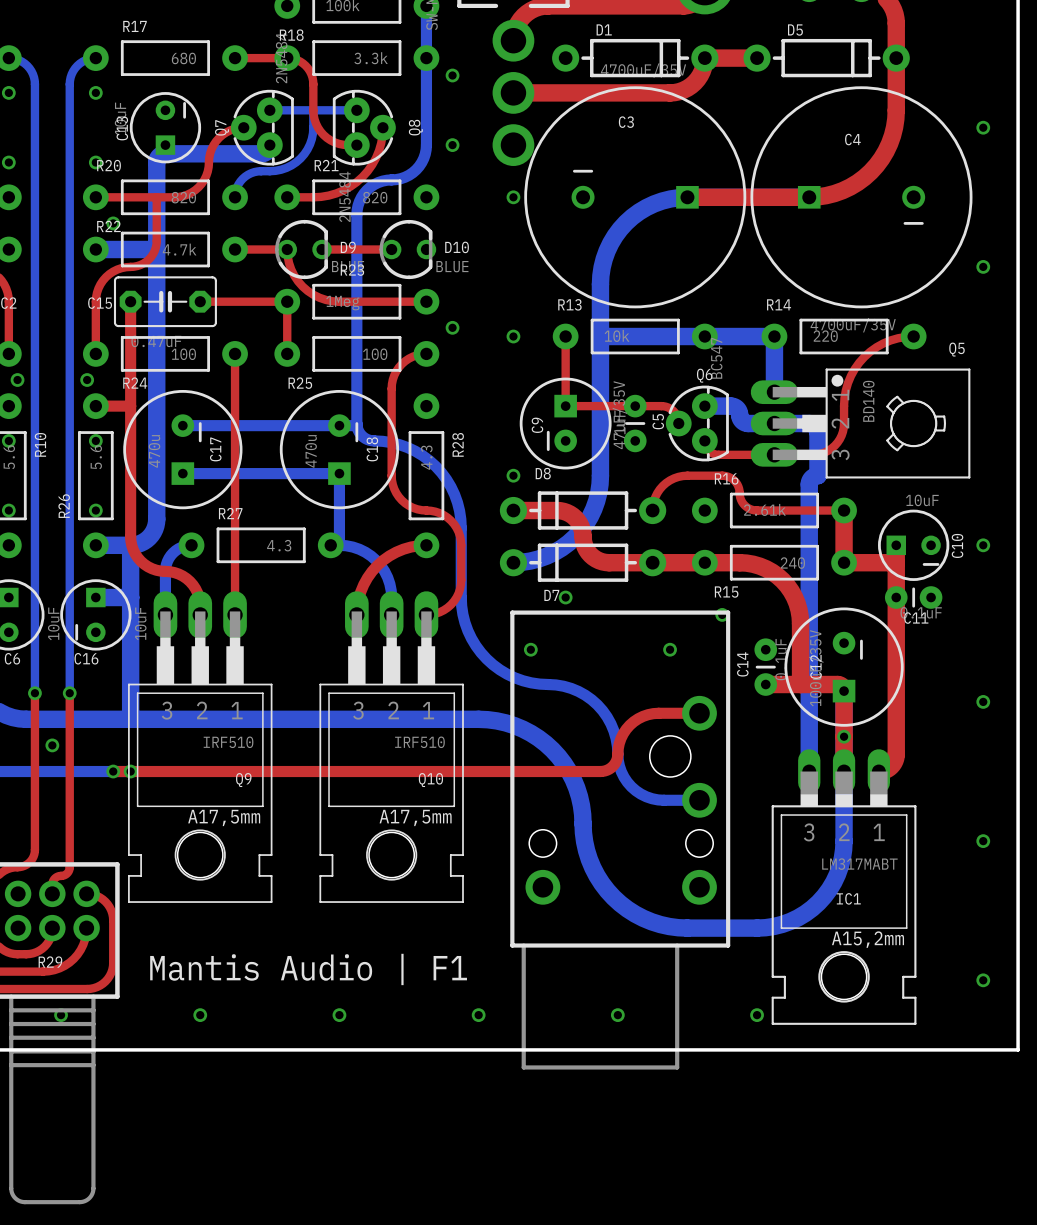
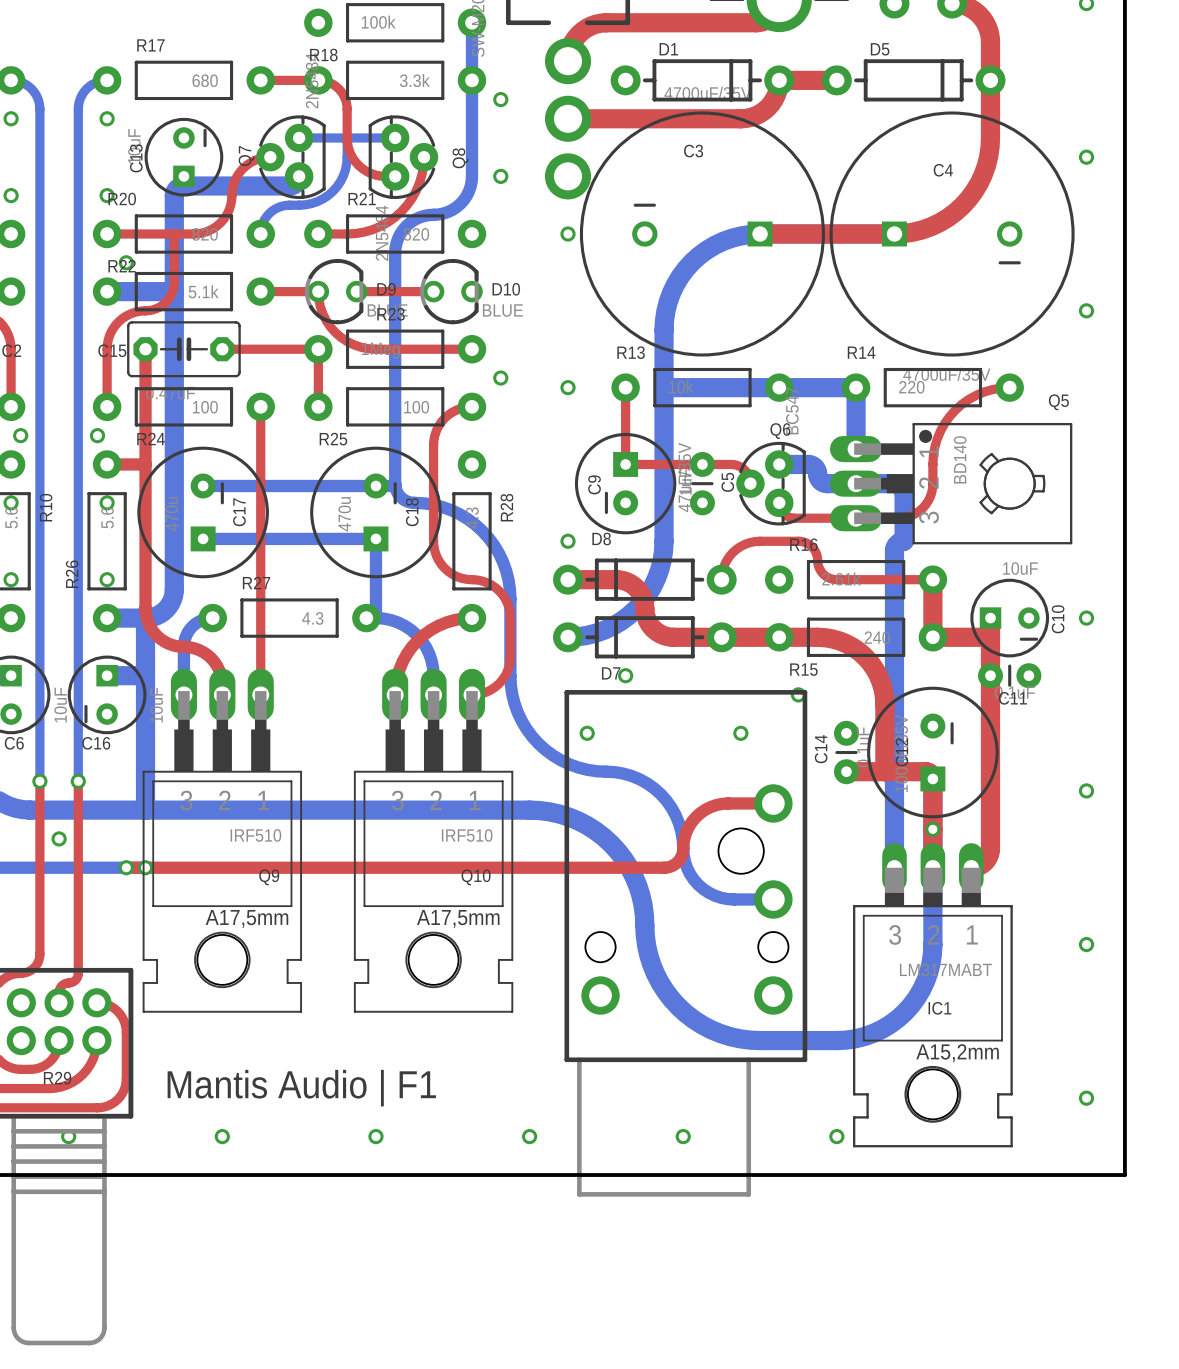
R22 value: 4.7k (179, 249) -> 5.1k (203, 291)

